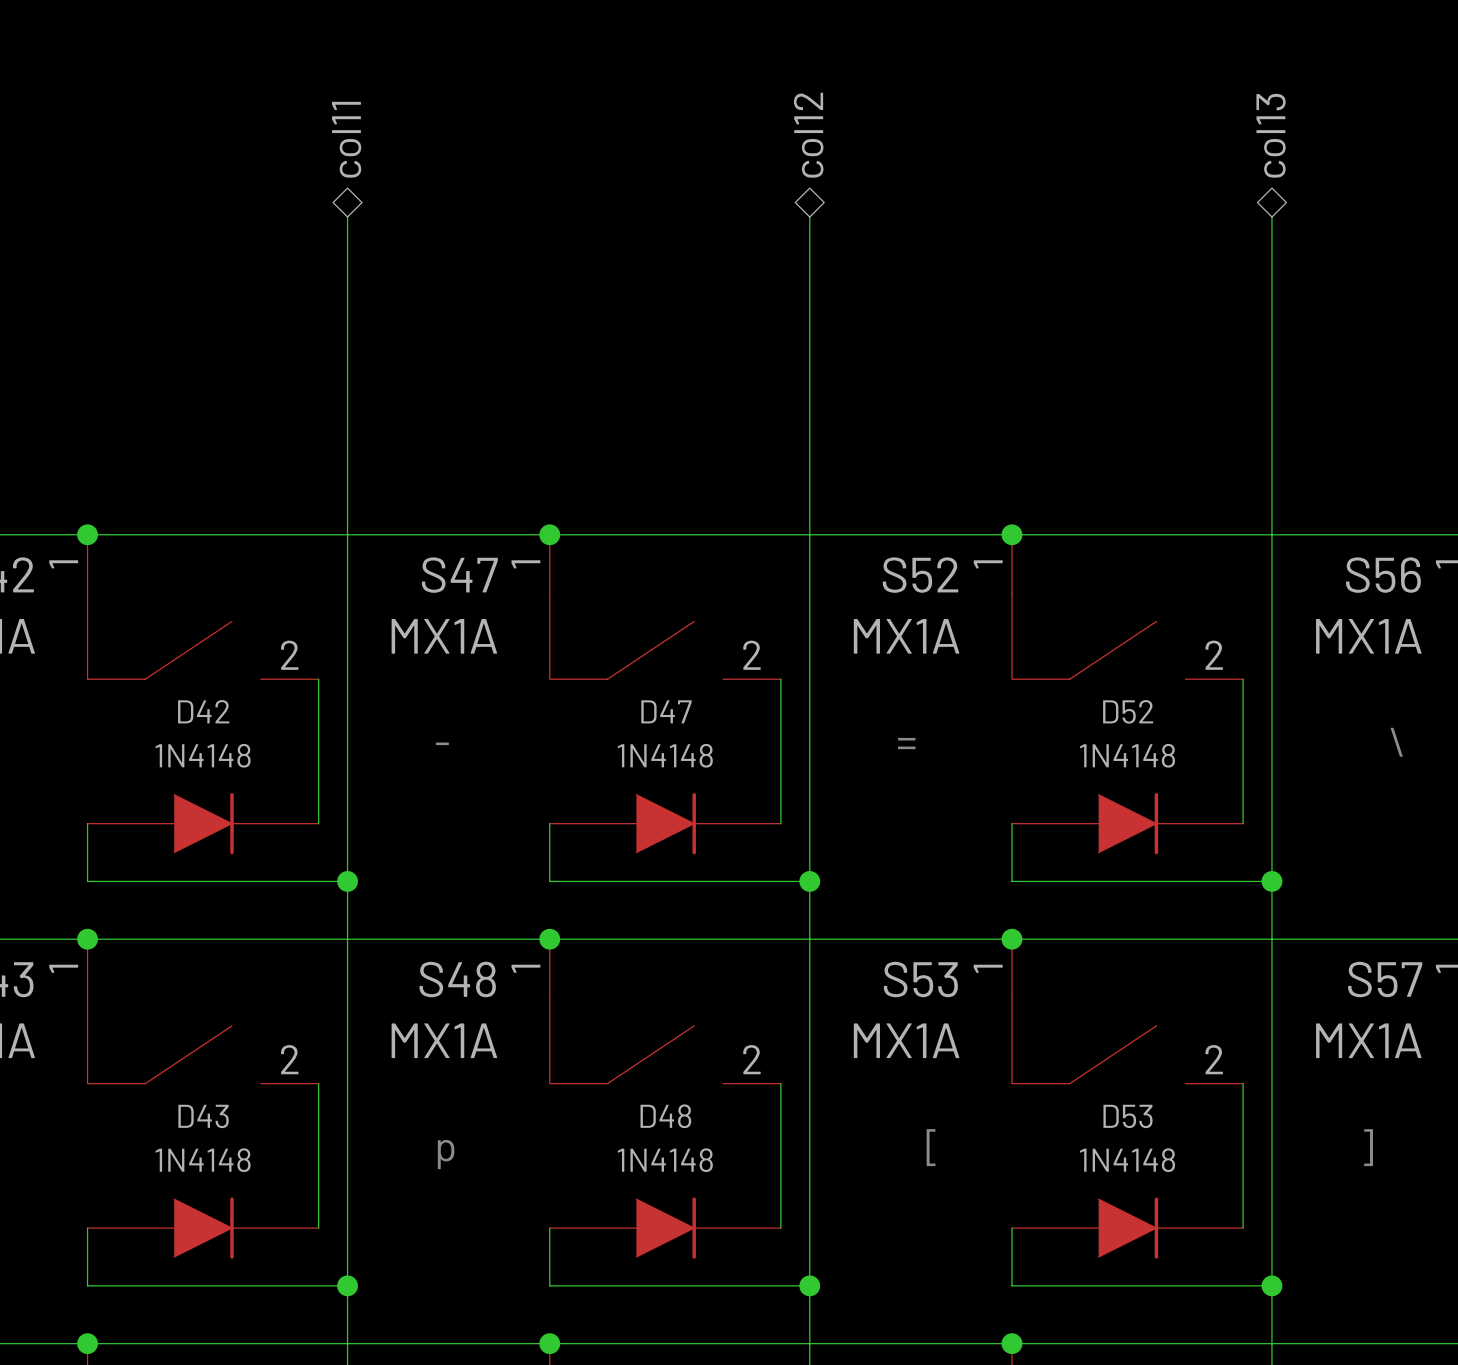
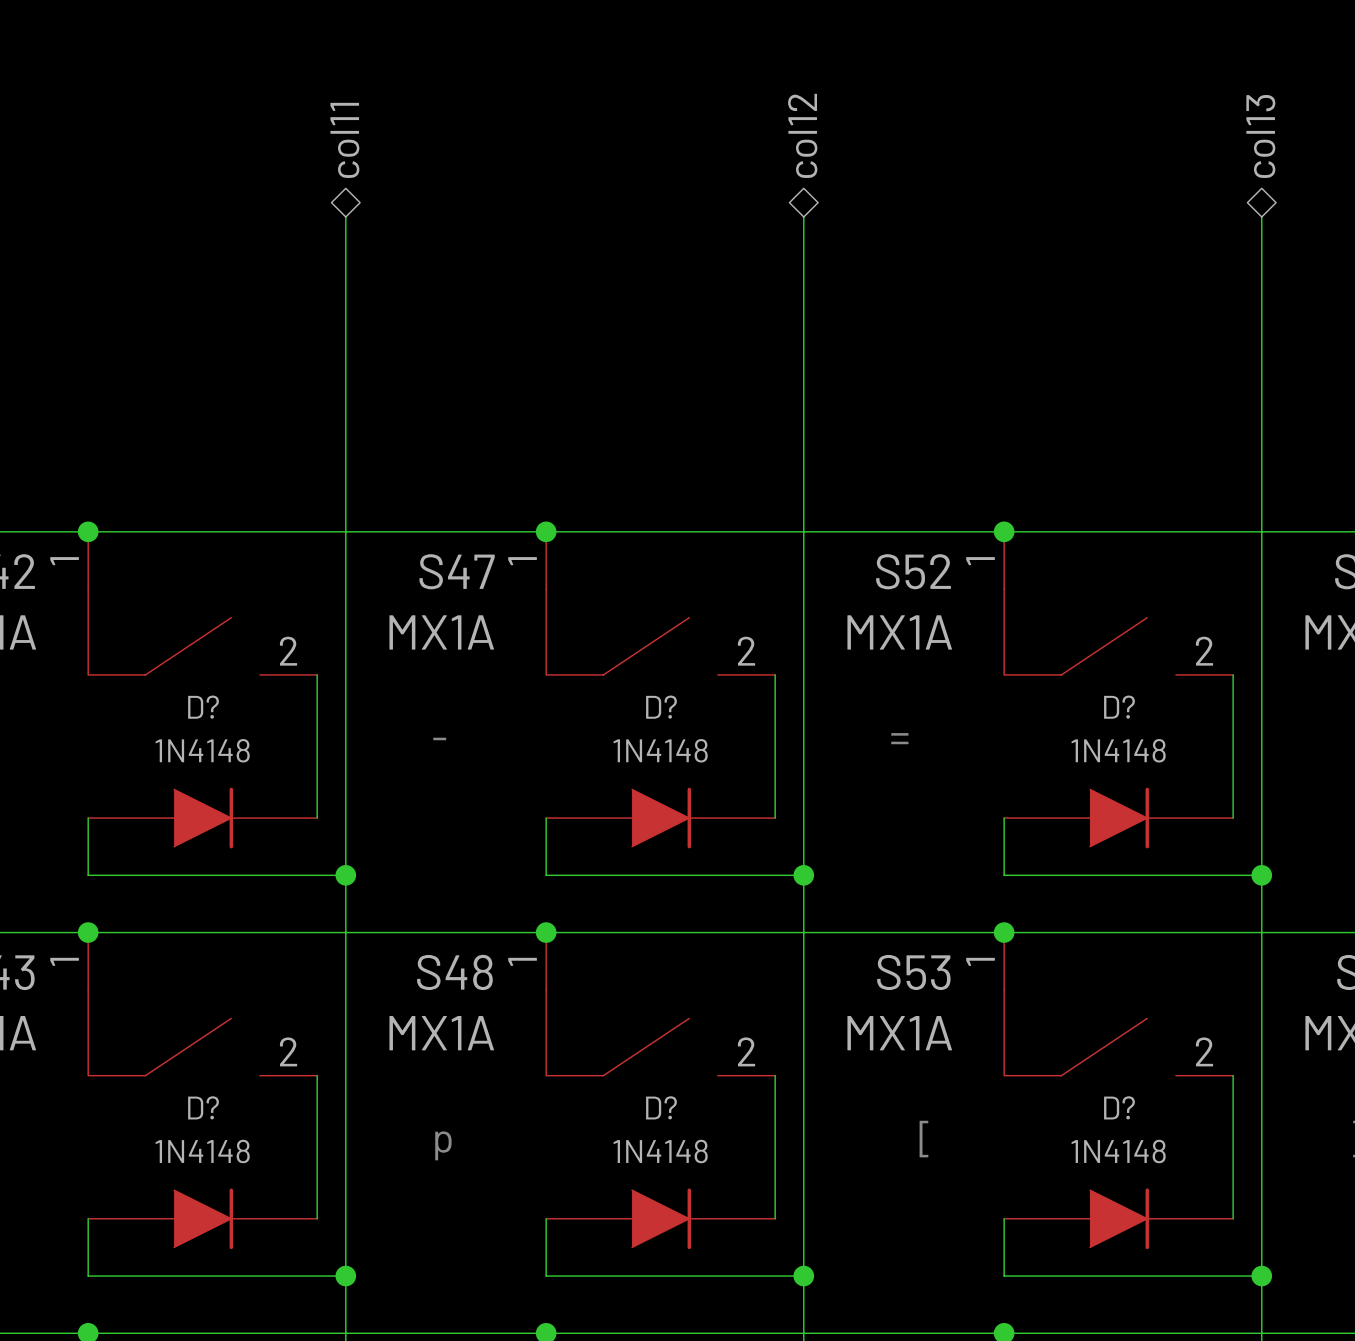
D42 name: D42 (203, 711) -> D? (203, 707)
D47 name: D47 (666, 711) -> D? (661, 707)
D52 name: D52 (1128, 711) -> D? (1119, 707)
D43 name: D43 (203, 1116) -> D? (203, 1107)
D48 name: D48 (665, 1116) -> D? (661, 1107)
D53 name: D53 (1128, 1116) -> D? (1119, 1107)

